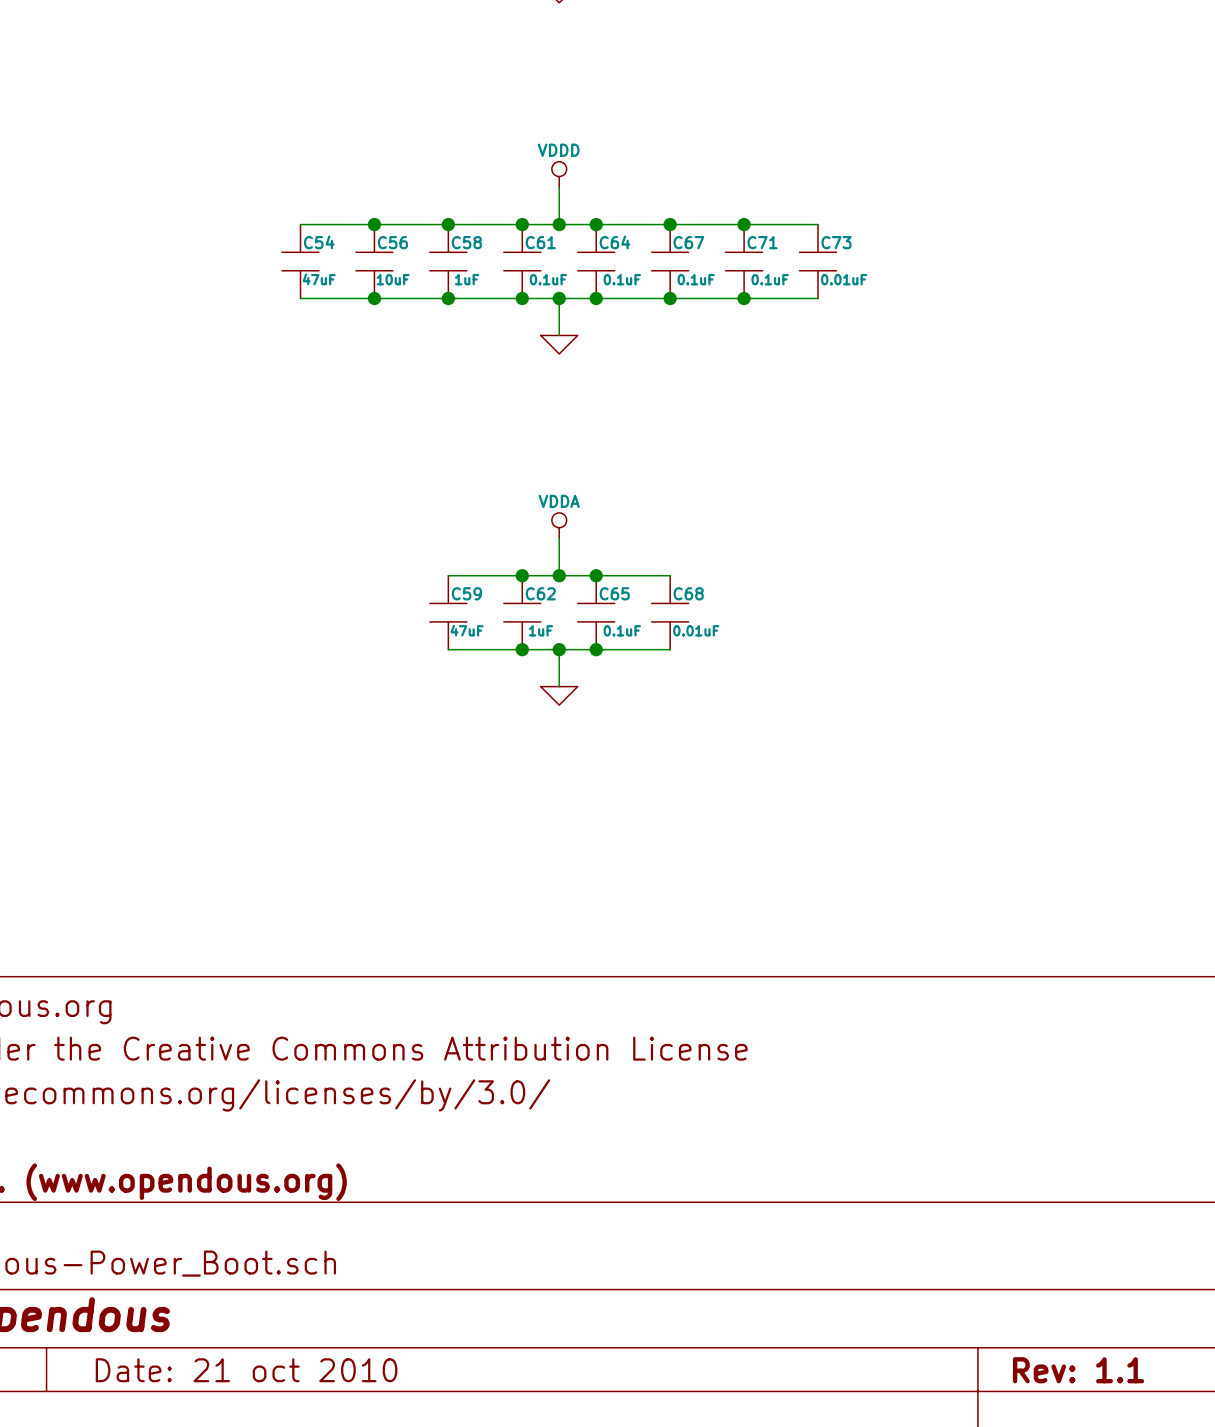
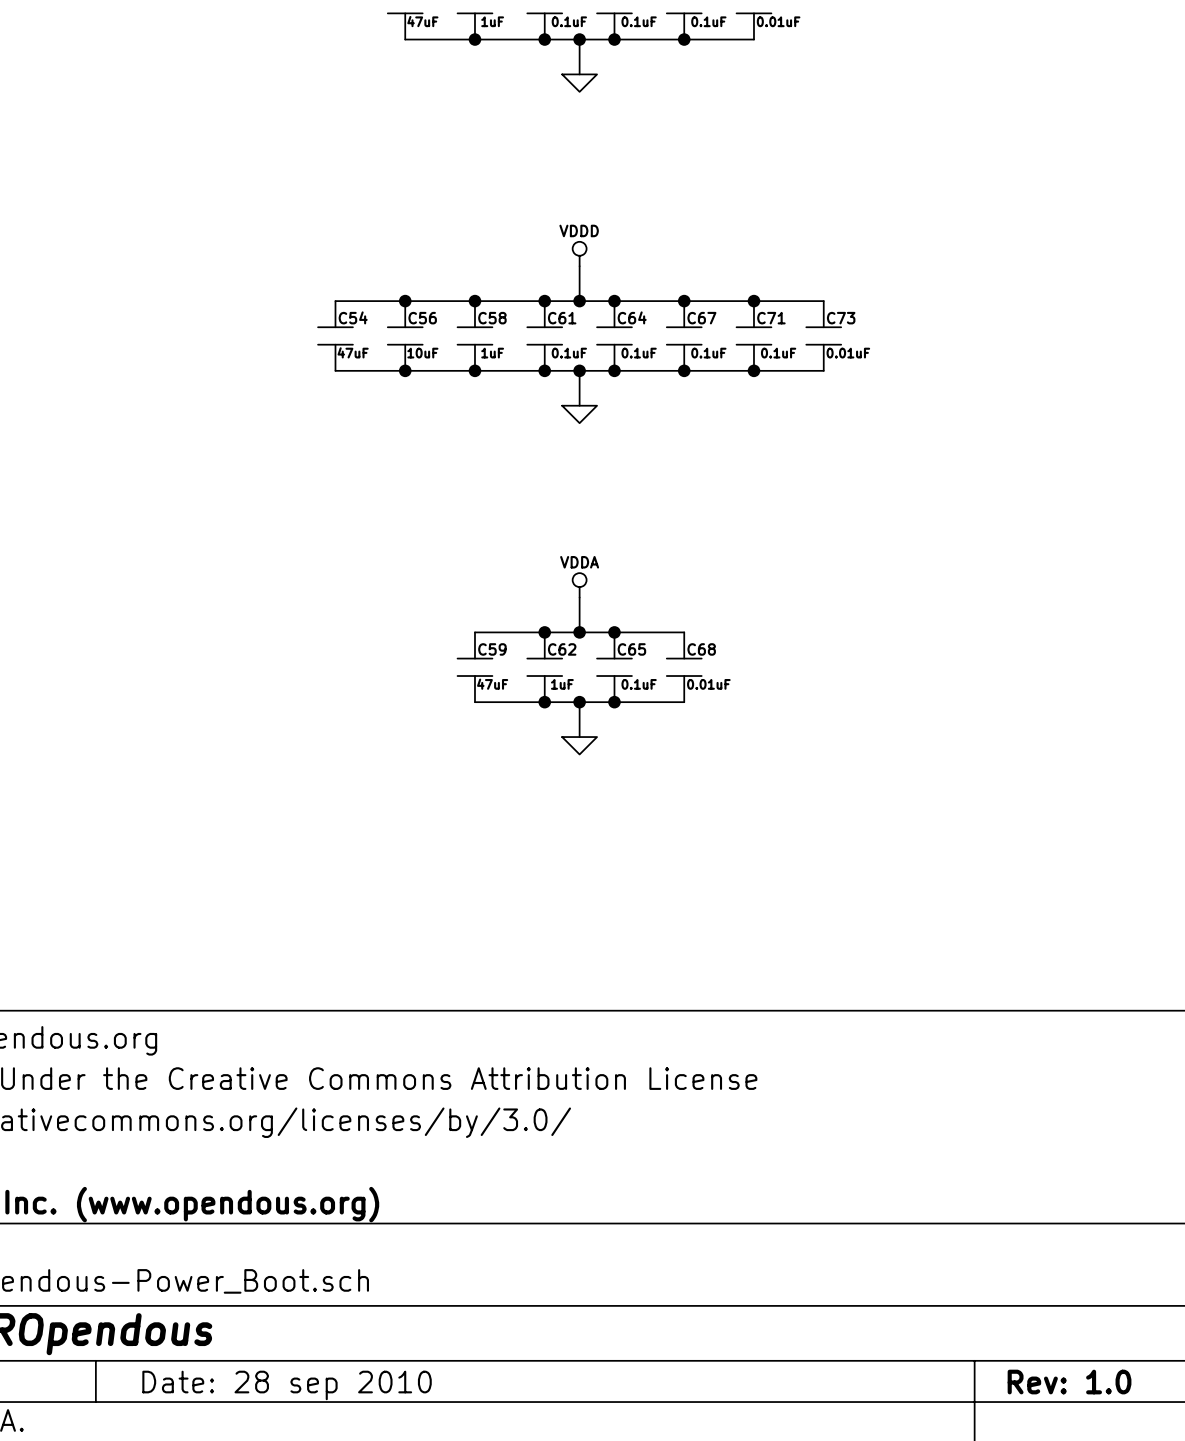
title block: Date: 21 oct 2010 (246, 1370) -> Date: 28 sep 2010 (287, 1385)
title block: Rev: 1.1 (1078, 1370) -> Rev: 1.0 (1069, 1382)

